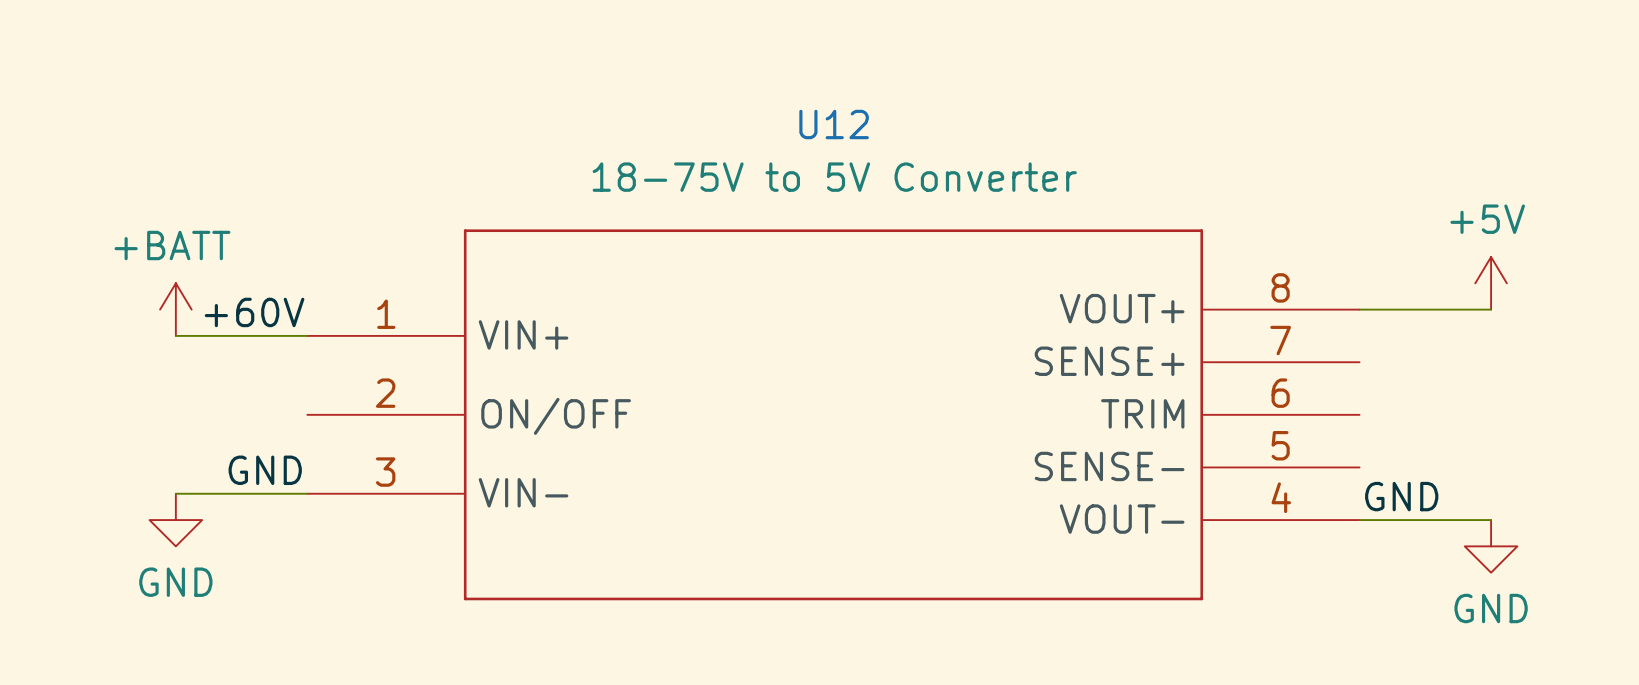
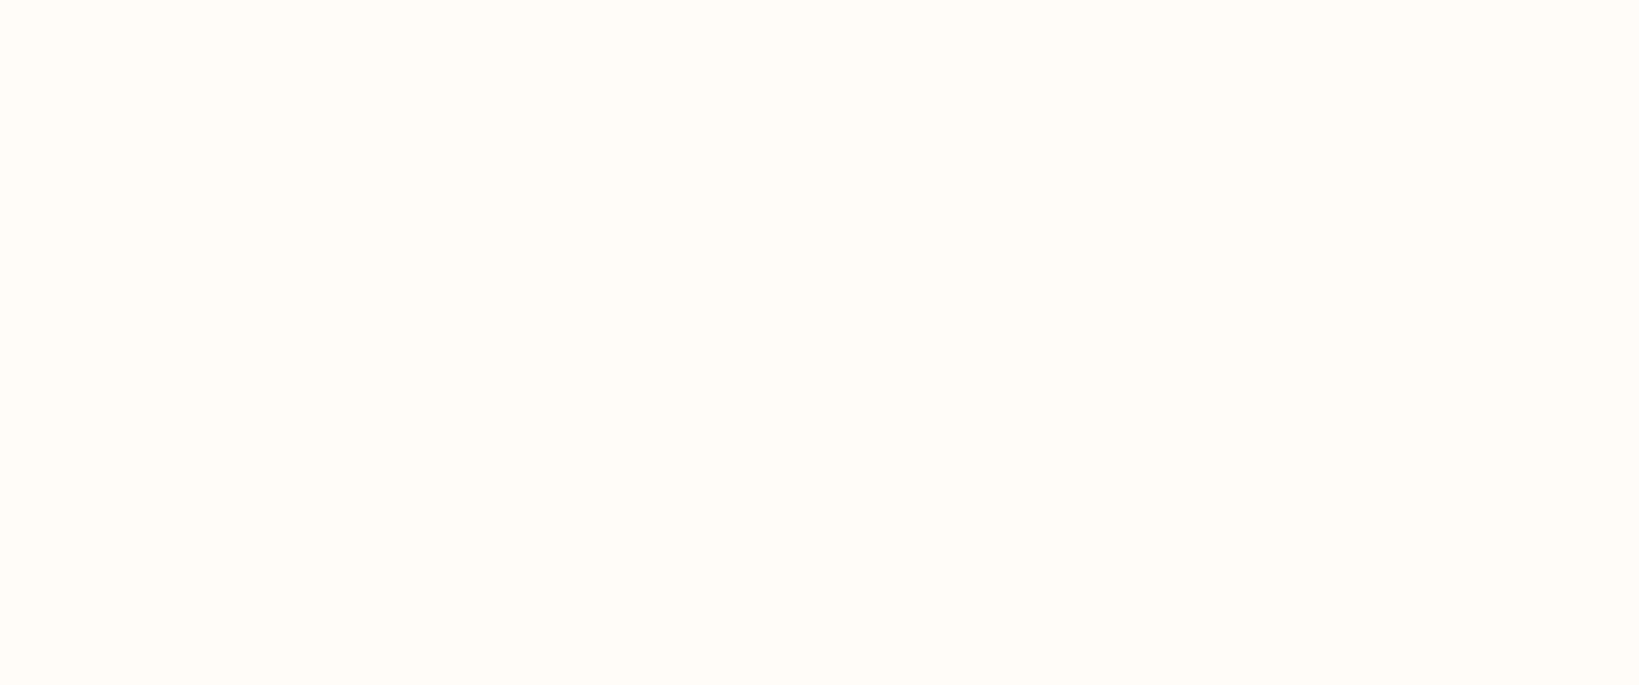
power symbol: +5V (1491, 283) -> none
power symbol: +BATT (175, 309) -> none
wire: (1359, 309) (1491, 309) -> none
label: +60V (254, 312) -> none
wire: (175, 335) (307, 335) -> none
U12: 18-75V to 5V Converter (833, 414) -> none
label: GND (265, 470) -> none
wire: (175, 493) (307, 493) -> none
label: GND (1401, 496) -> none
power symbol: GND (175, 520) -> none
wire: (1359, 520) (1491, 520) -> none
power symbol: GND (1491, 546) -> none

